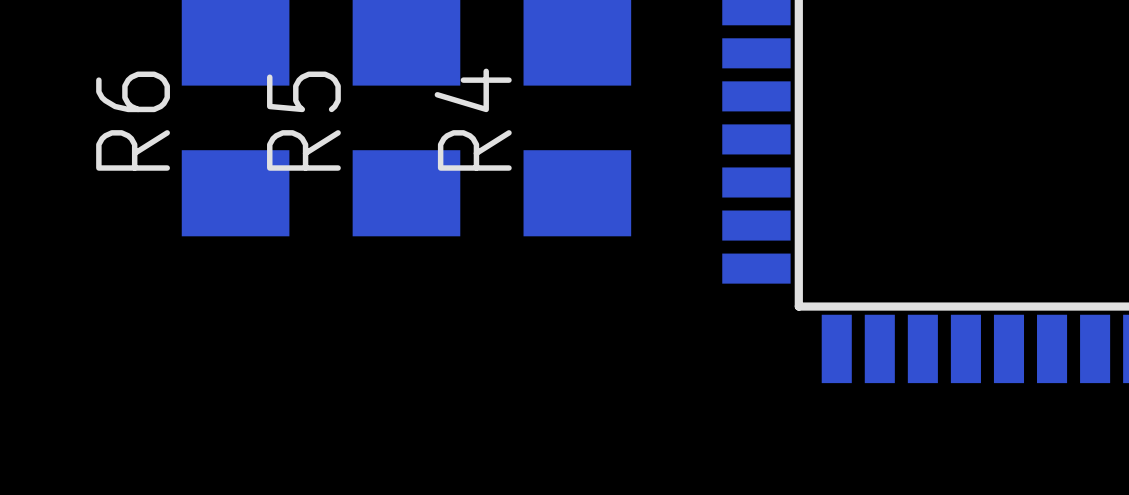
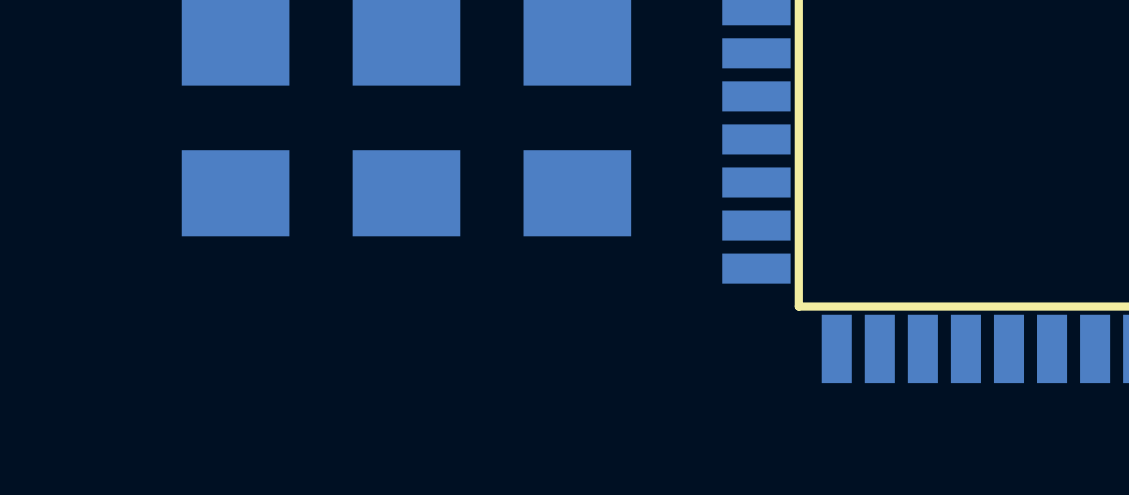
R4 name: R4 (473, 119) -> none
R6 name: R6 (133, 121) -> none
R5 name: R5 (303, 121) -> none

